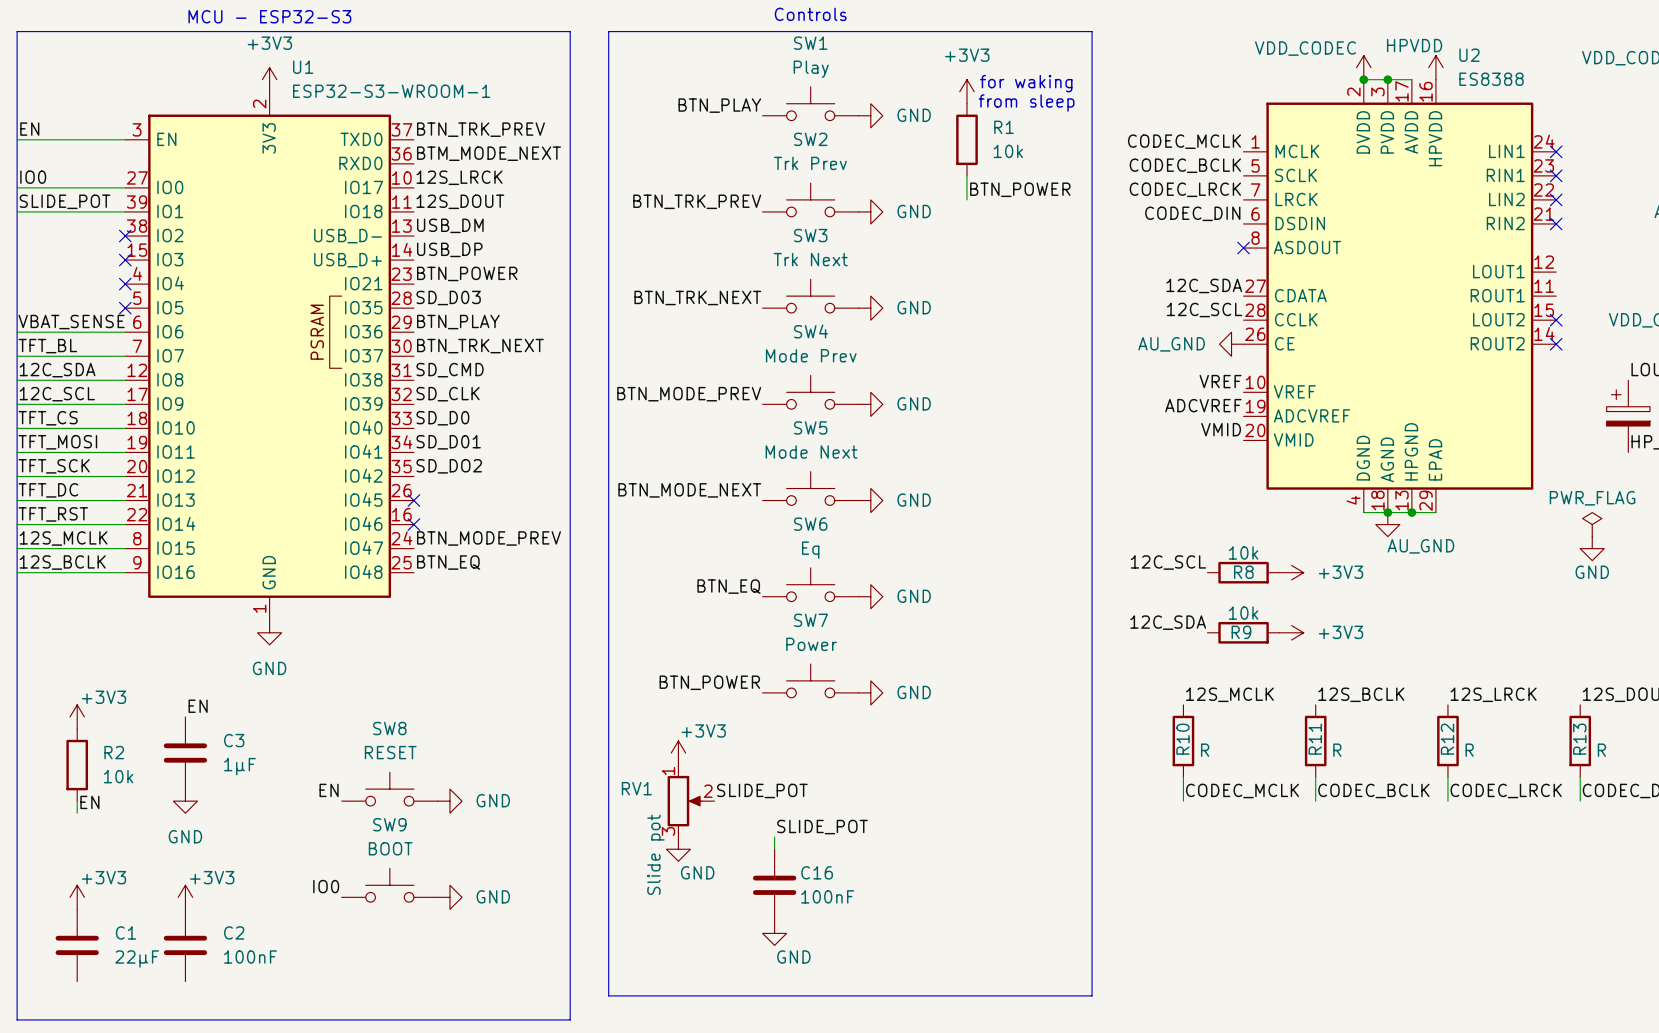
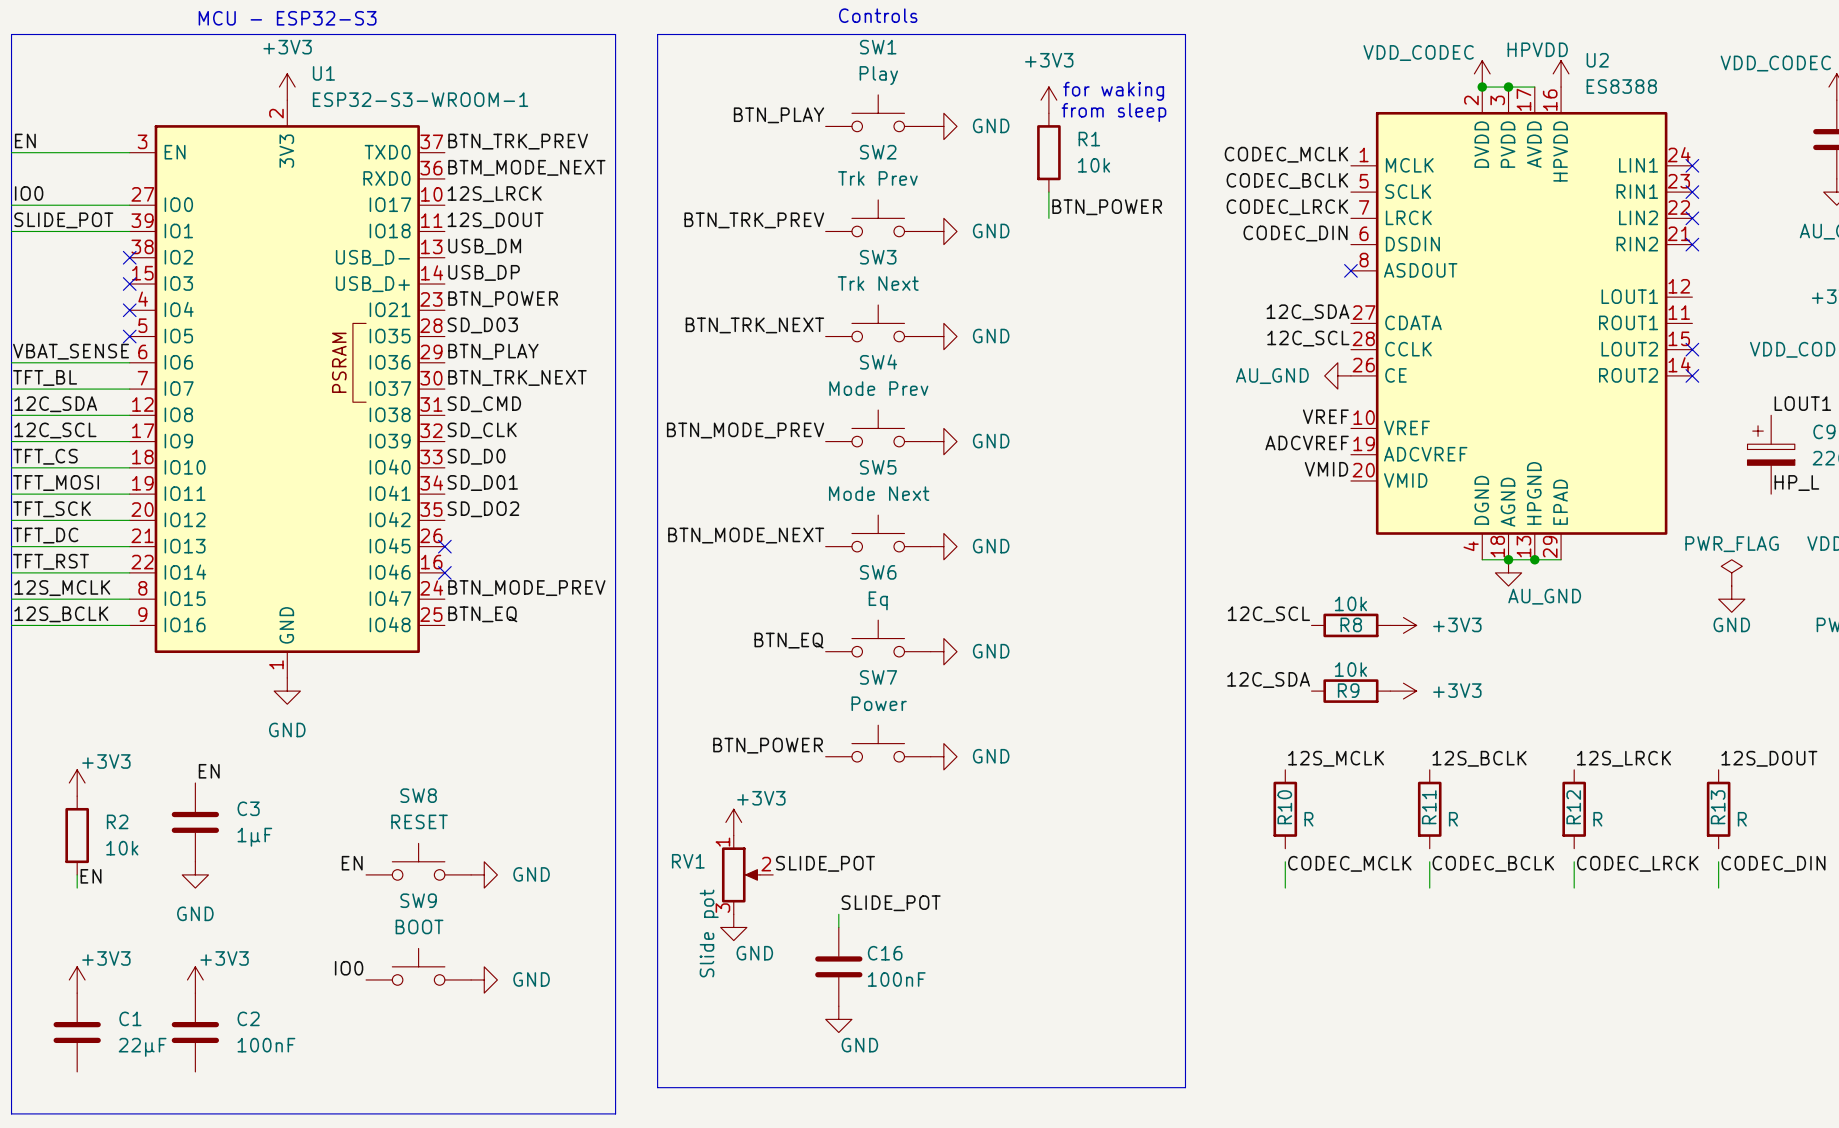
wire: (1183, 777) (1183, 789) -> (1285, 874) (1285, 888)
wire: (1315, 777) (1315, 789) -> (1429, 874) (1429, 888)
wire: (1447, 777) (1447, 789) -> (1574, 874) (1574, 888)
wire: (1580, 777) (1580, 789) -> (1718, 874) (1718, 888)

